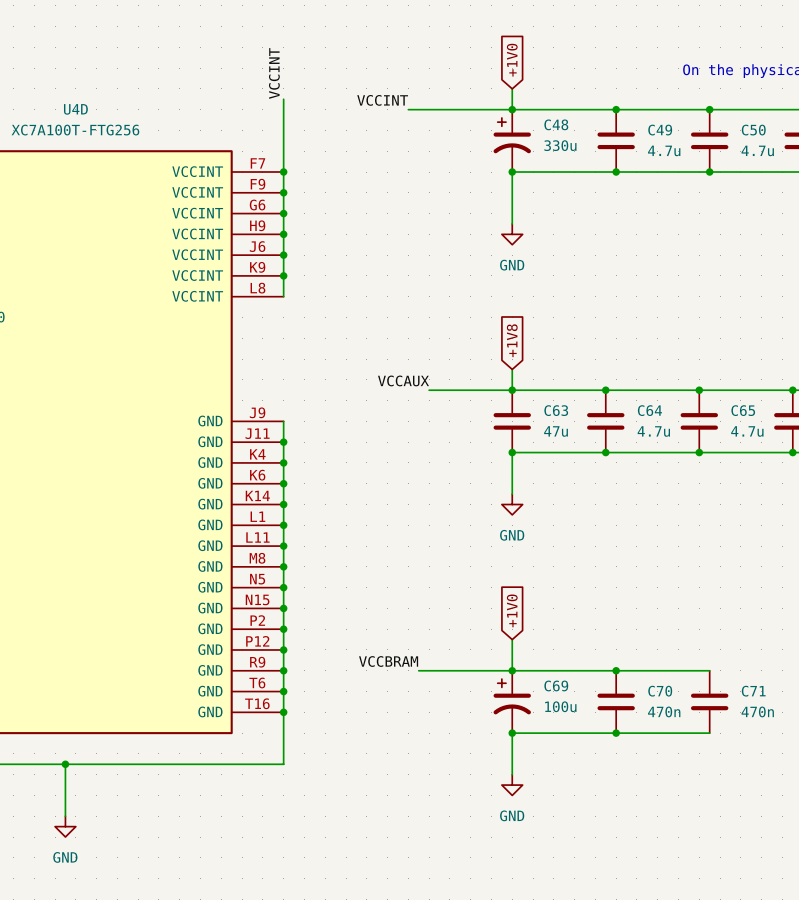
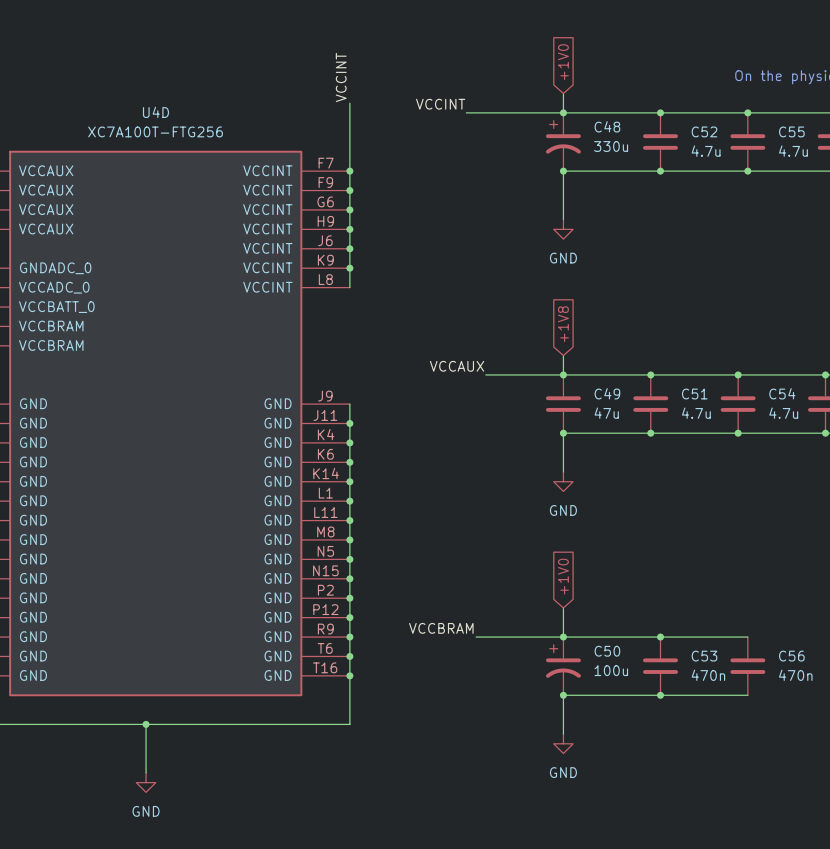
C49 name: C49 (660, 130) -> C52 (704, 131)
C50 name: C50 (753, 130) -> C55 (791, 131)
C63 name: C63 (556, 410) -> C49 (607, 393)
C64 name: C64 (649, 410) -> C51 (694, 394)
C65 name: C65 (743, 410) -> C54 (782, 393)
C69 name: C69 (556, 685) -> C50 (607, 651)
C70 name: C70 (660, 691) -> C53 (704, 656)
C71 name: C71 (753, 691) -> C56 (791, 656)

